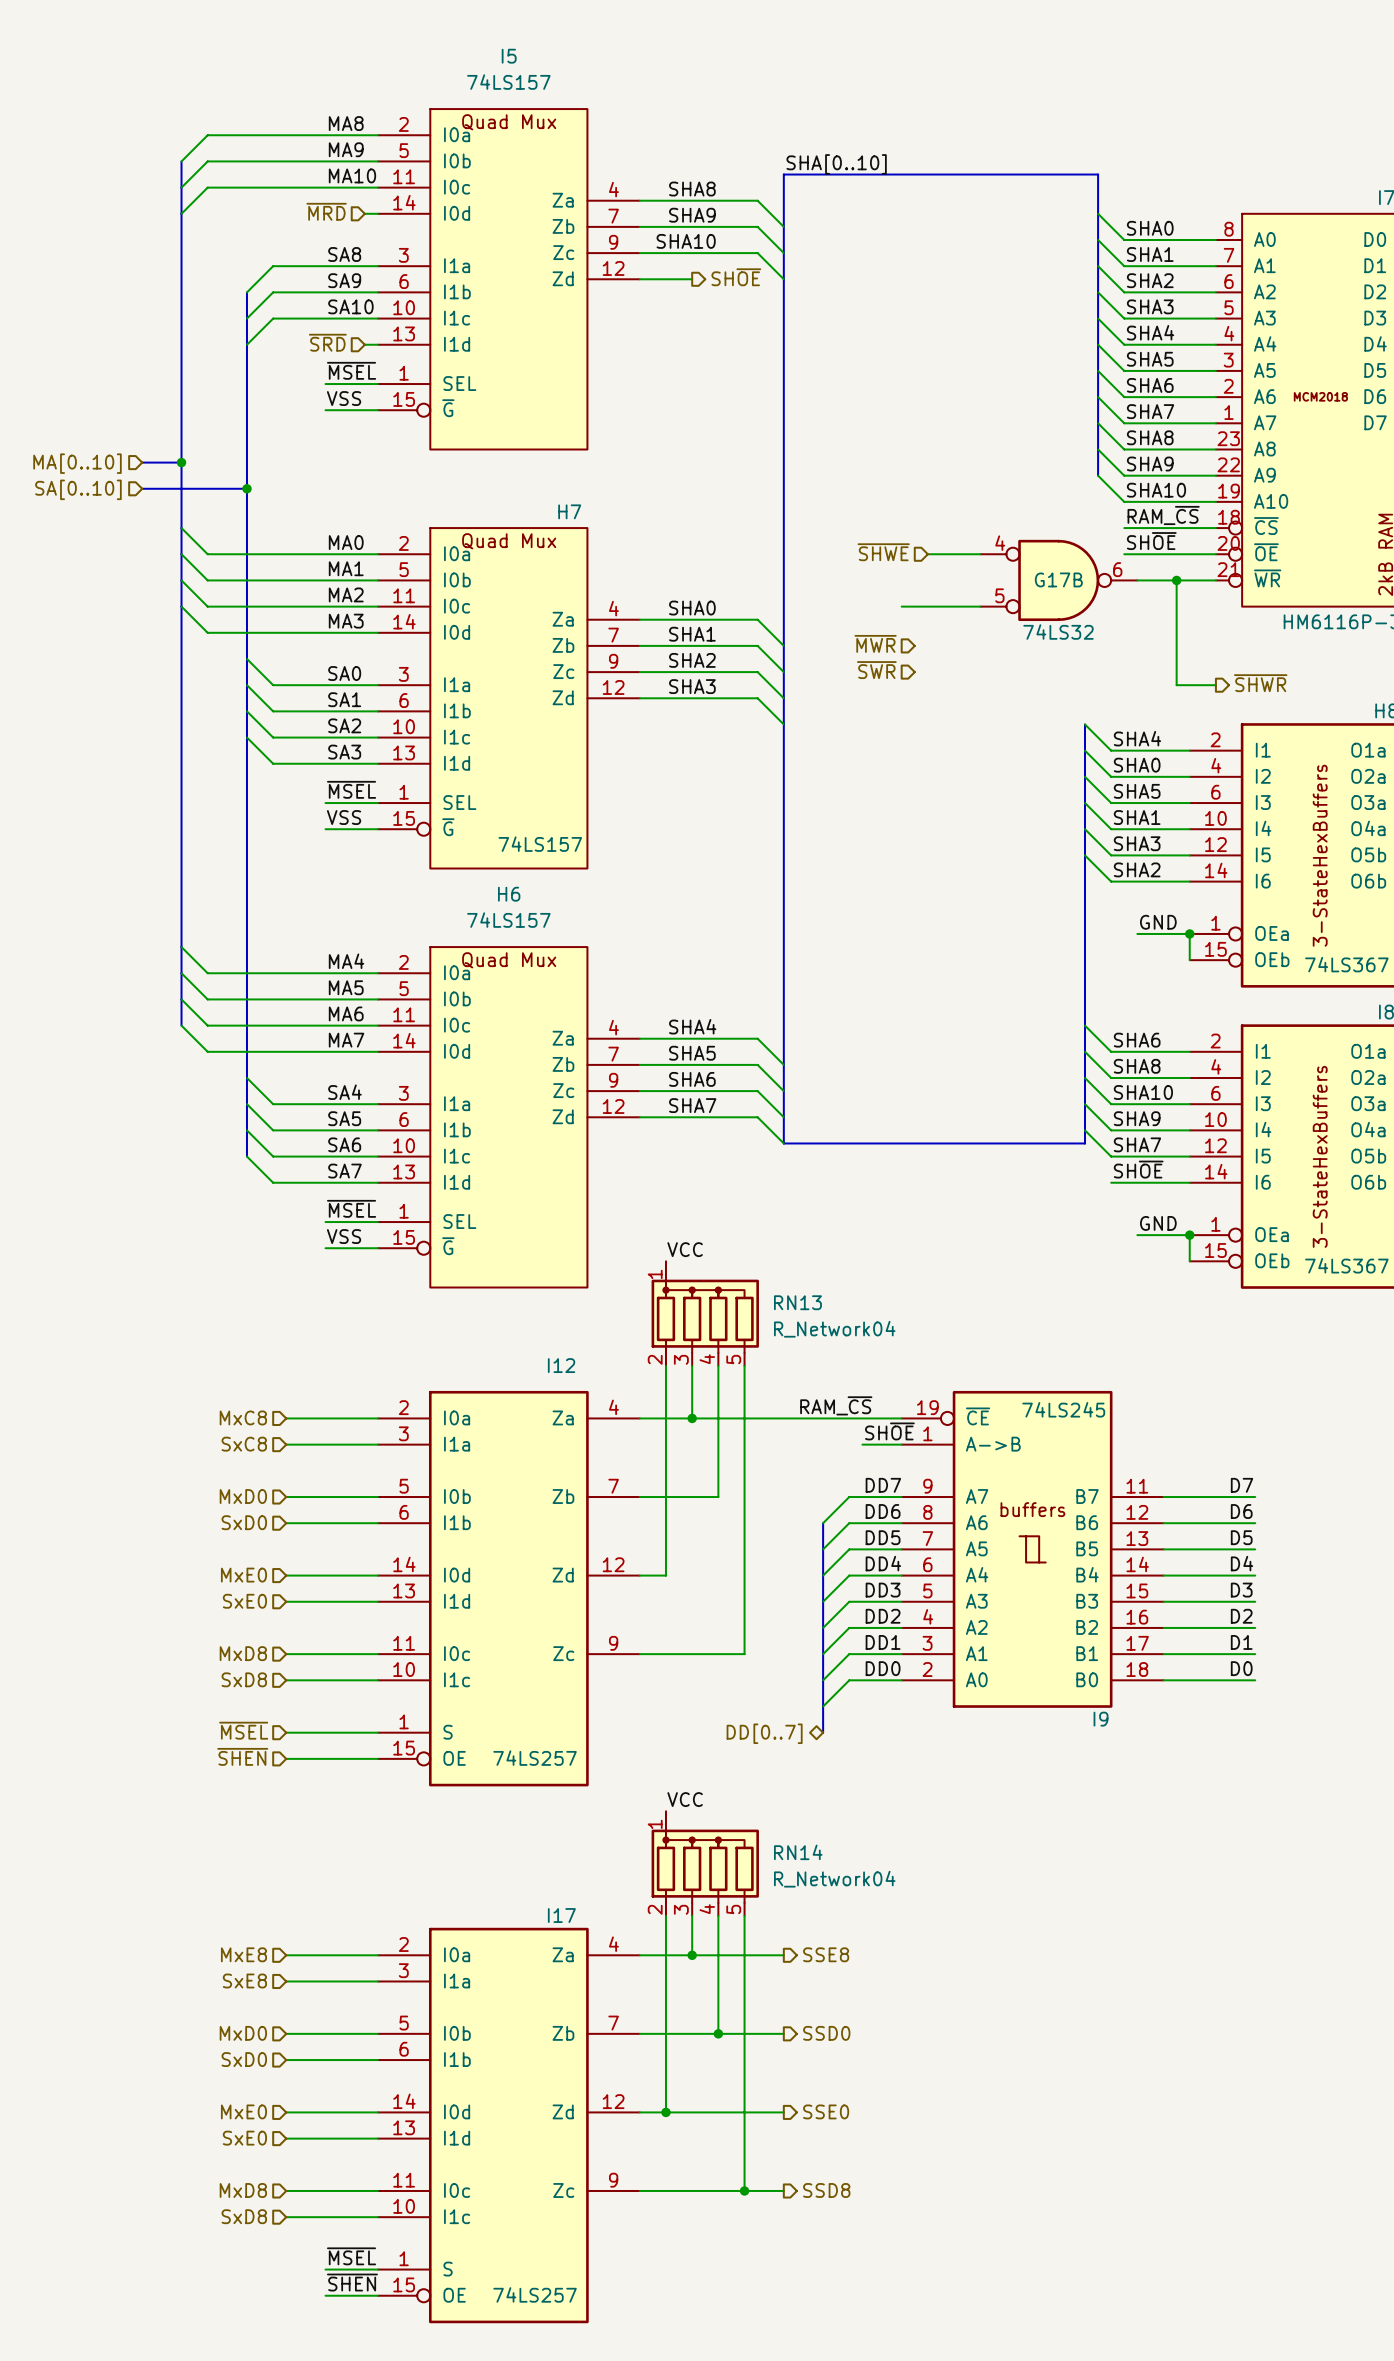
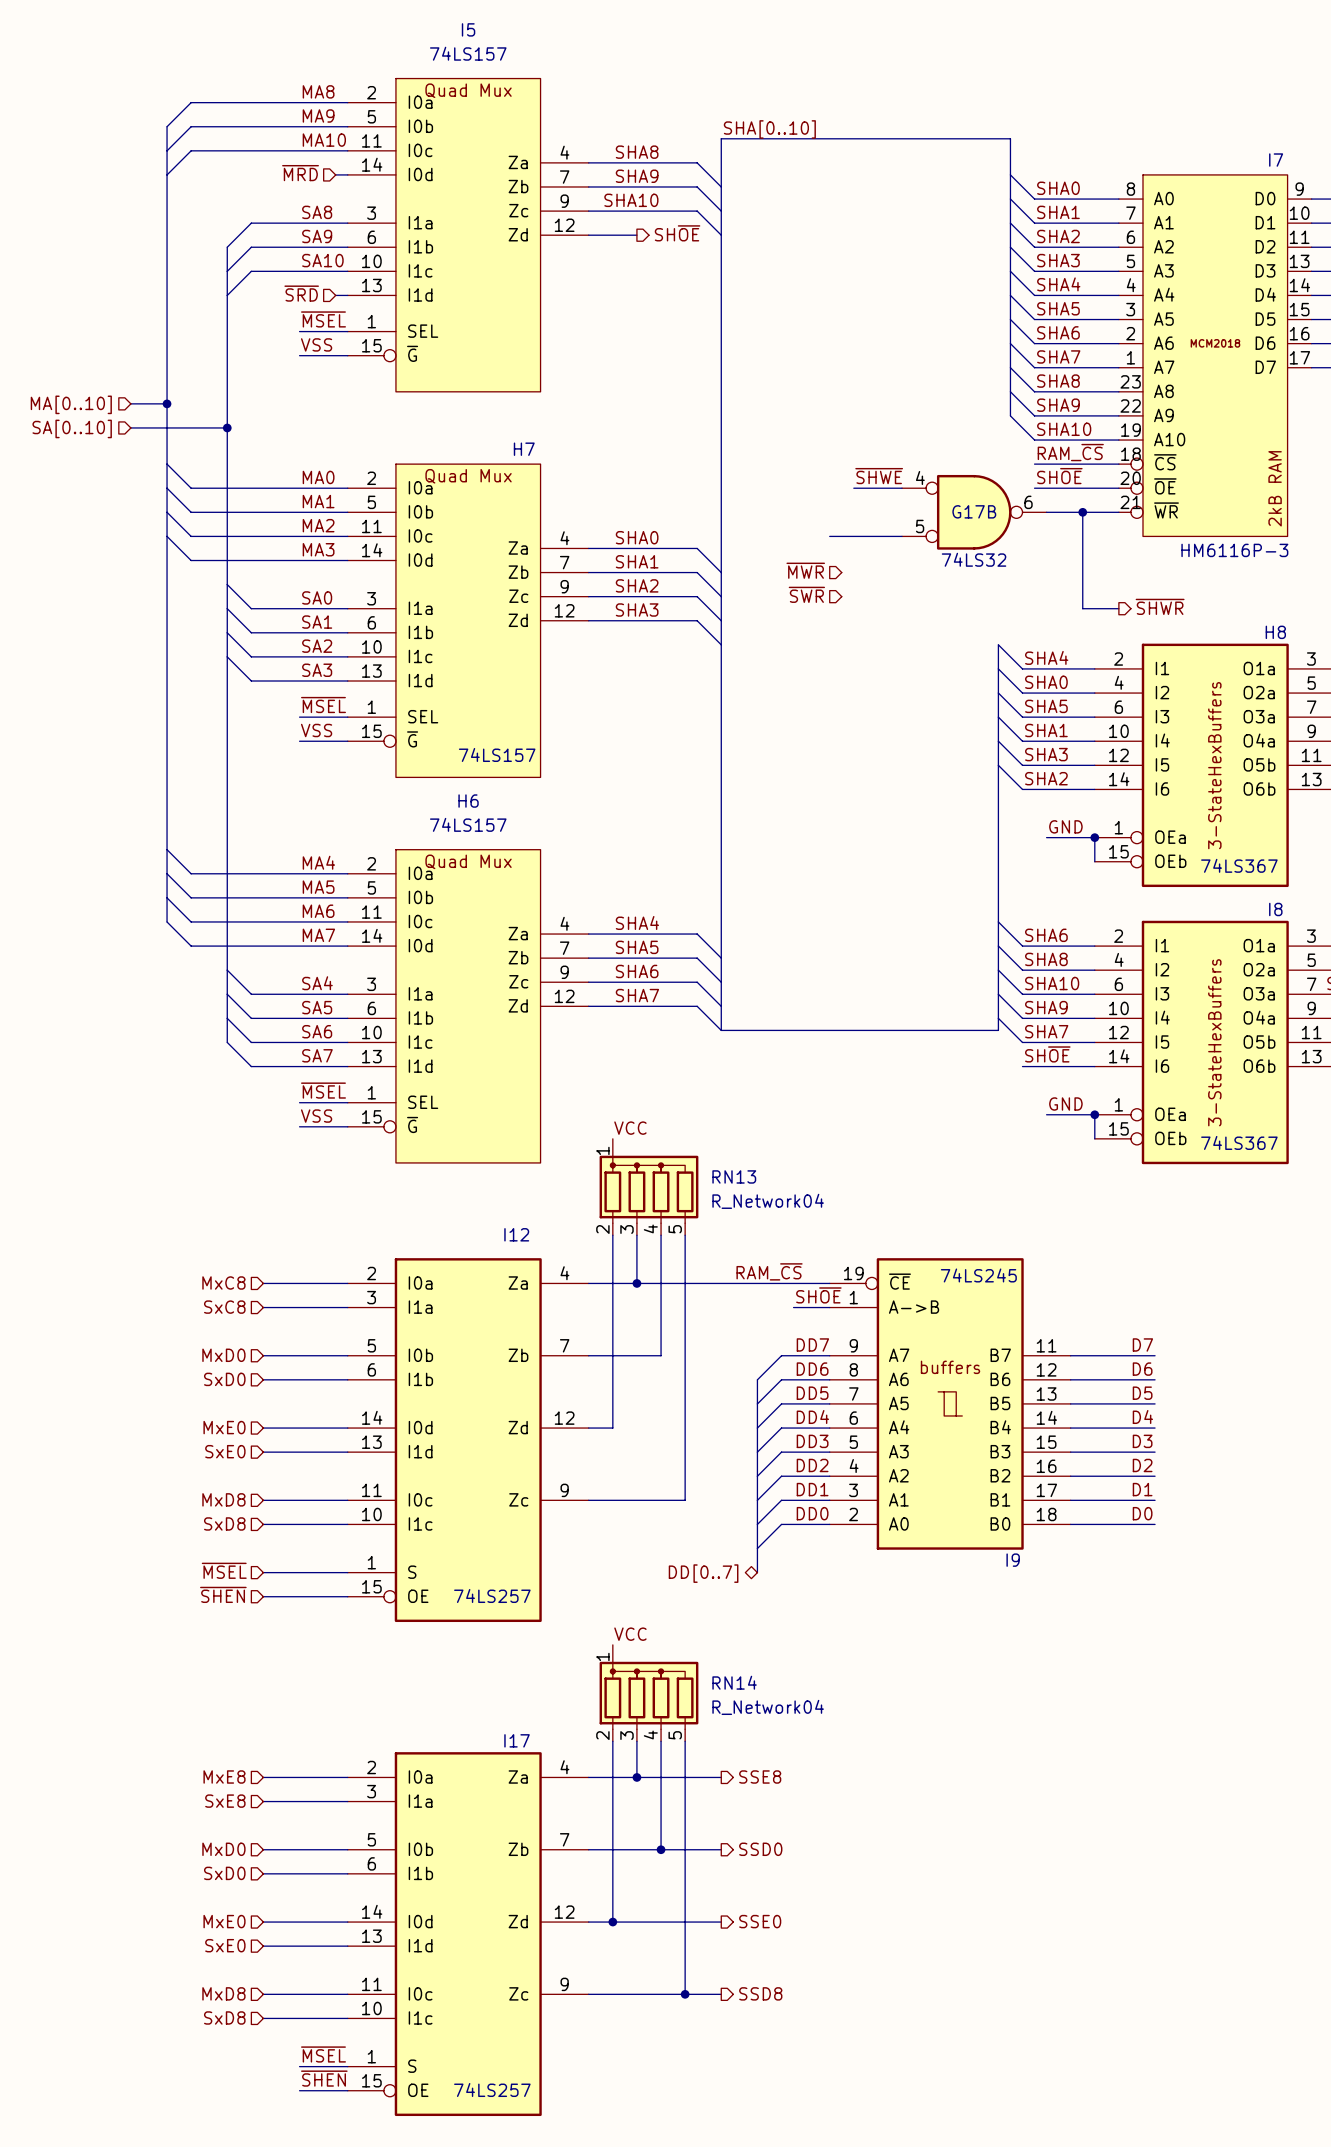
label: none -> ~{SHWE} (879, 476)
hierarchical label: ~{SHWE} (883, 552) -> none

